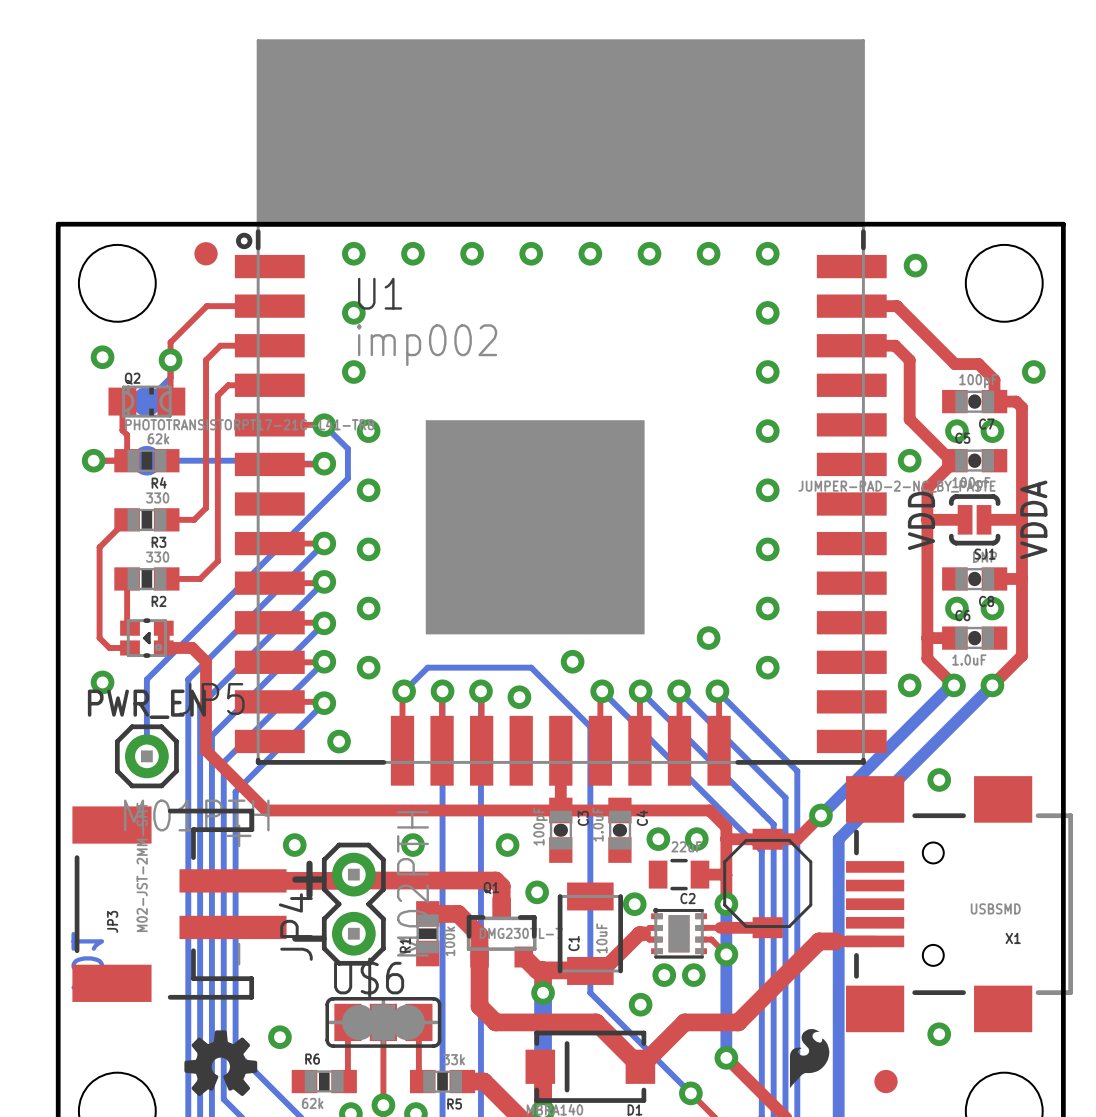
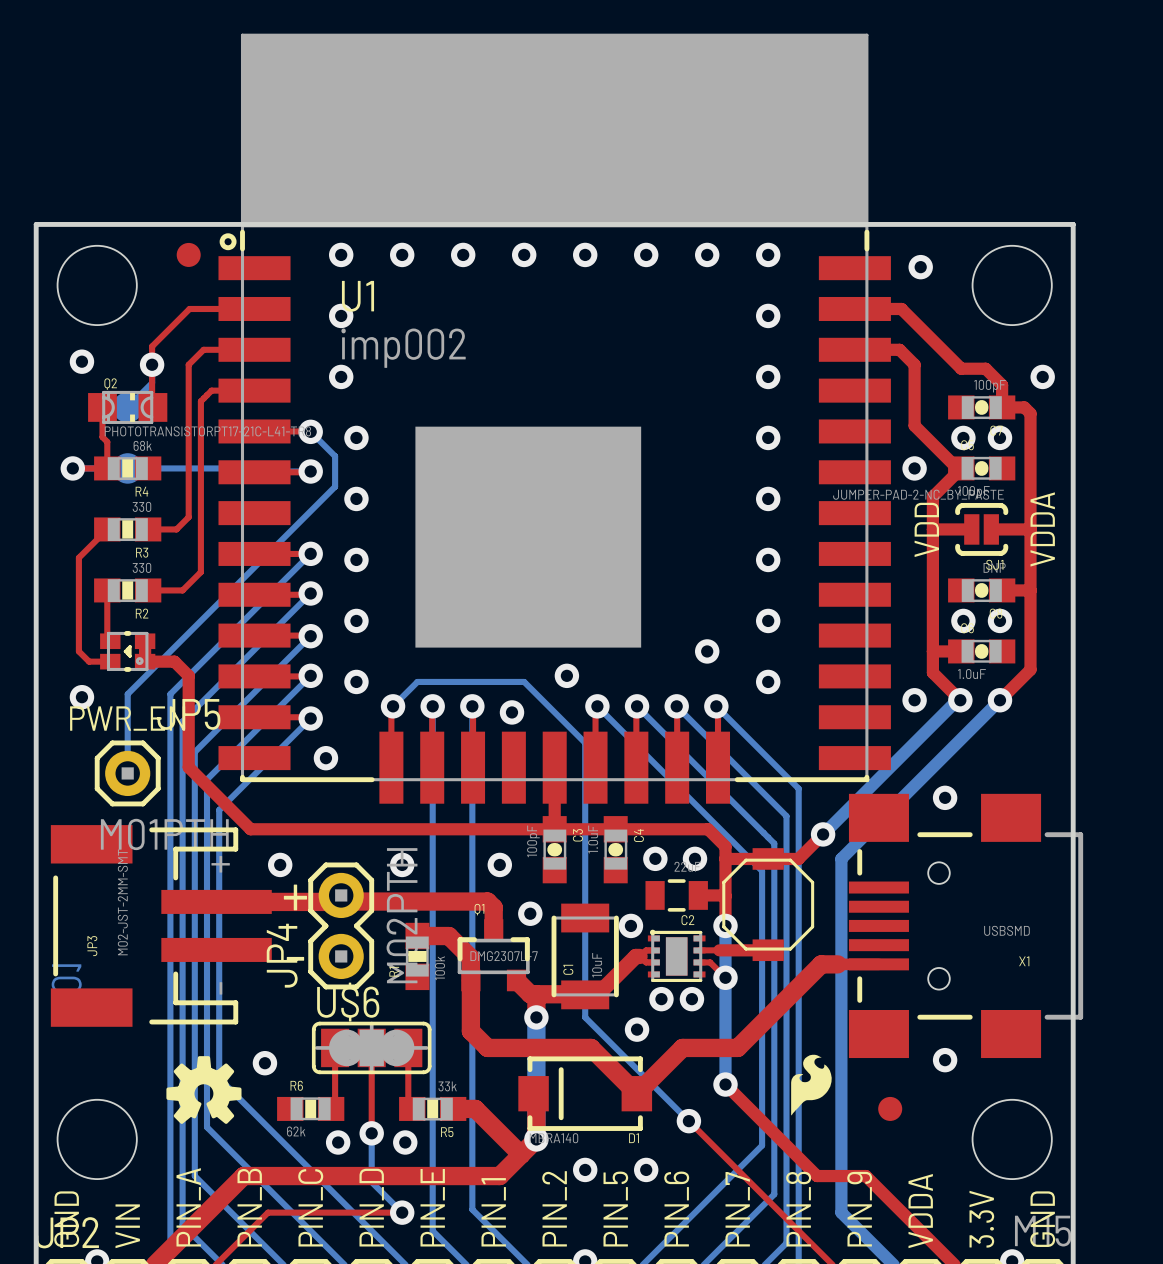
R4 value: 62k (158, 438) -> 68k (142, 445)

